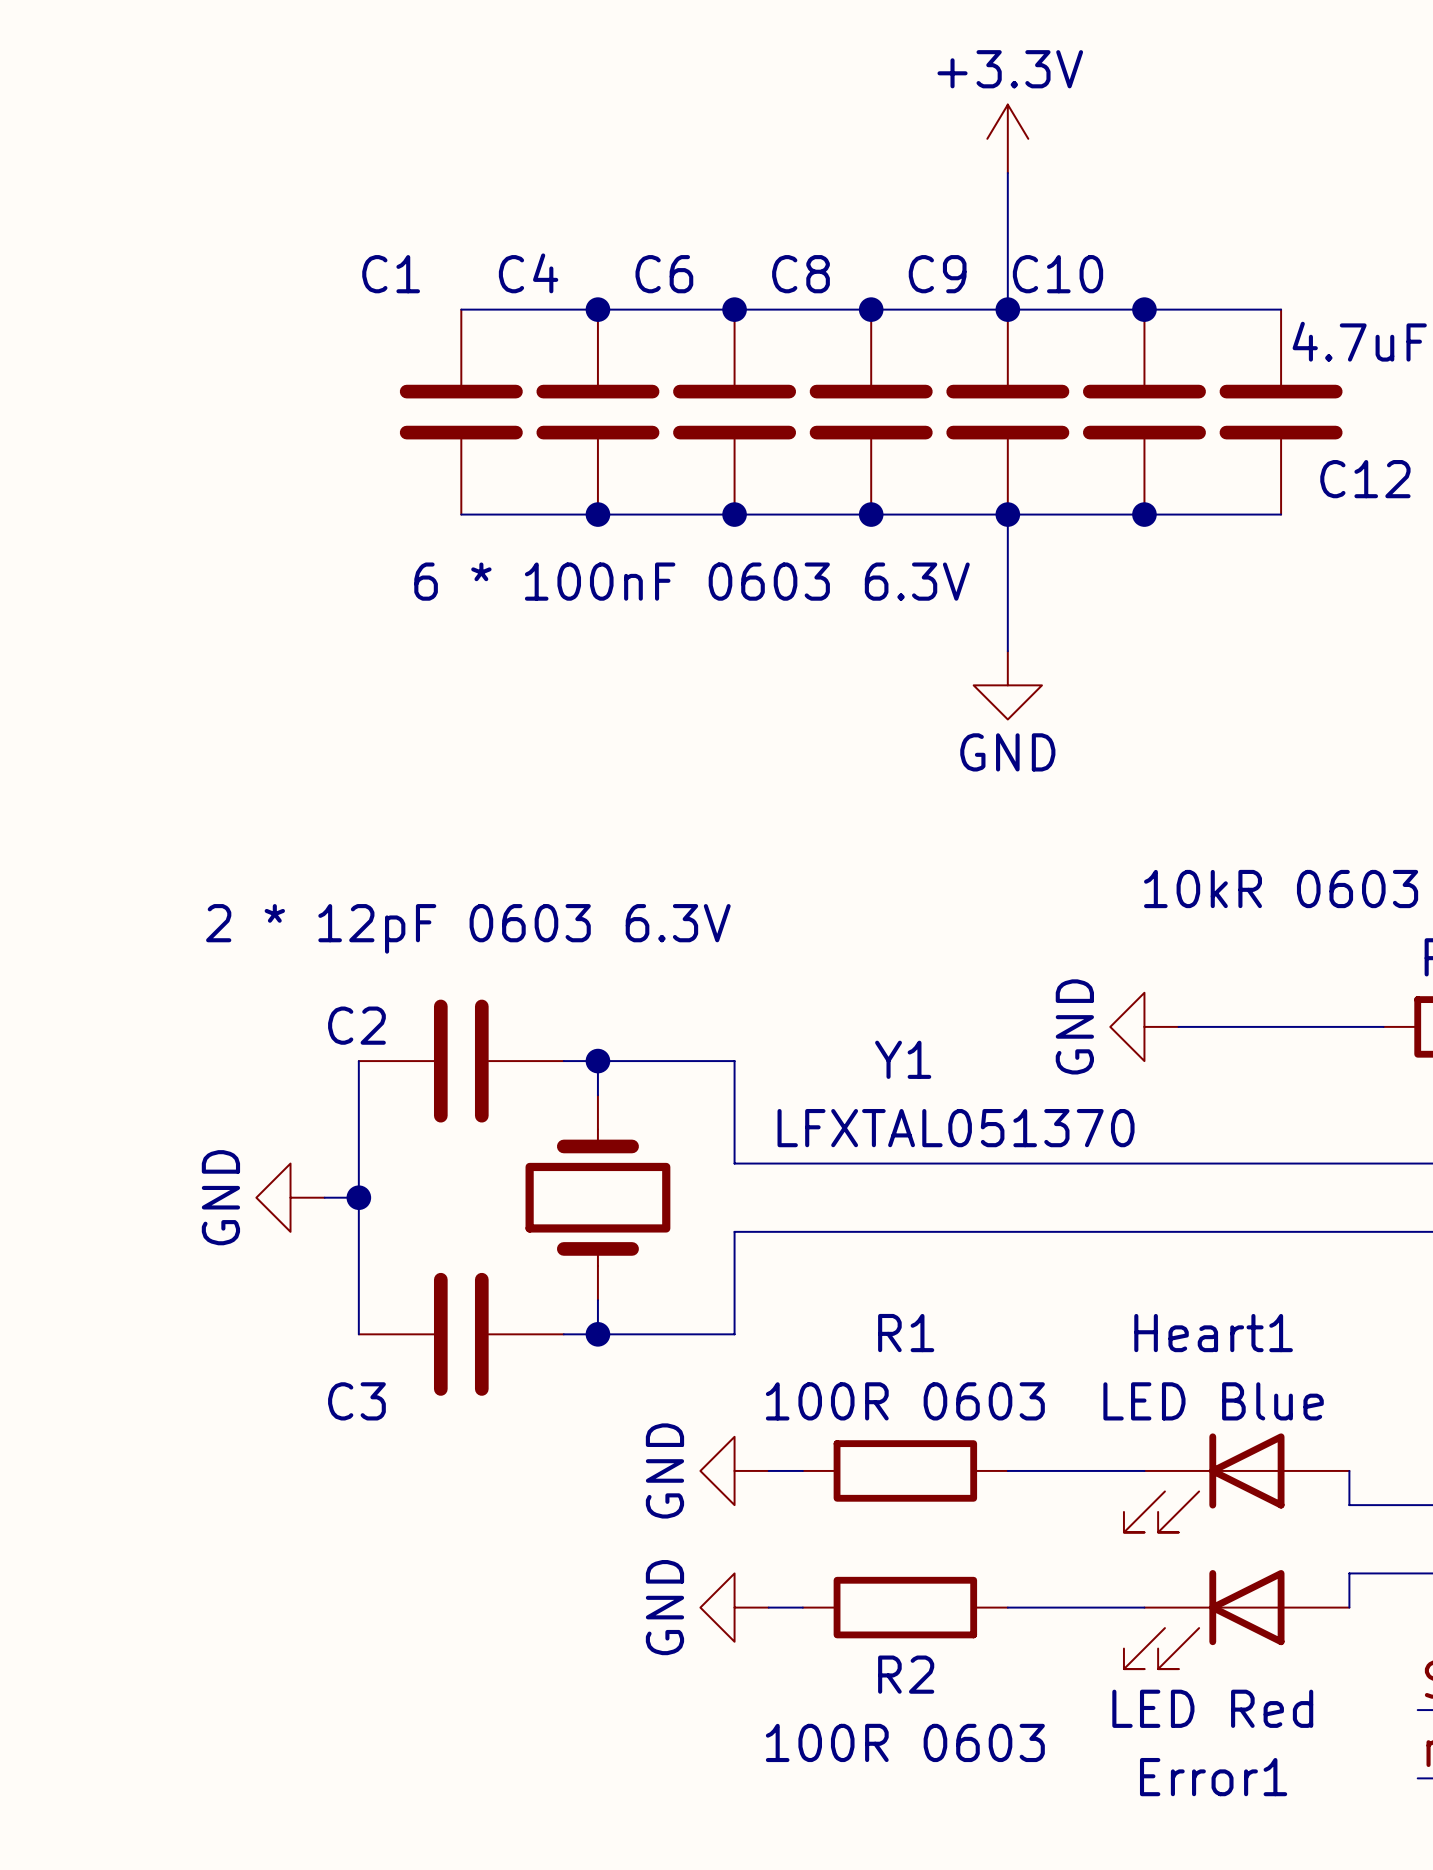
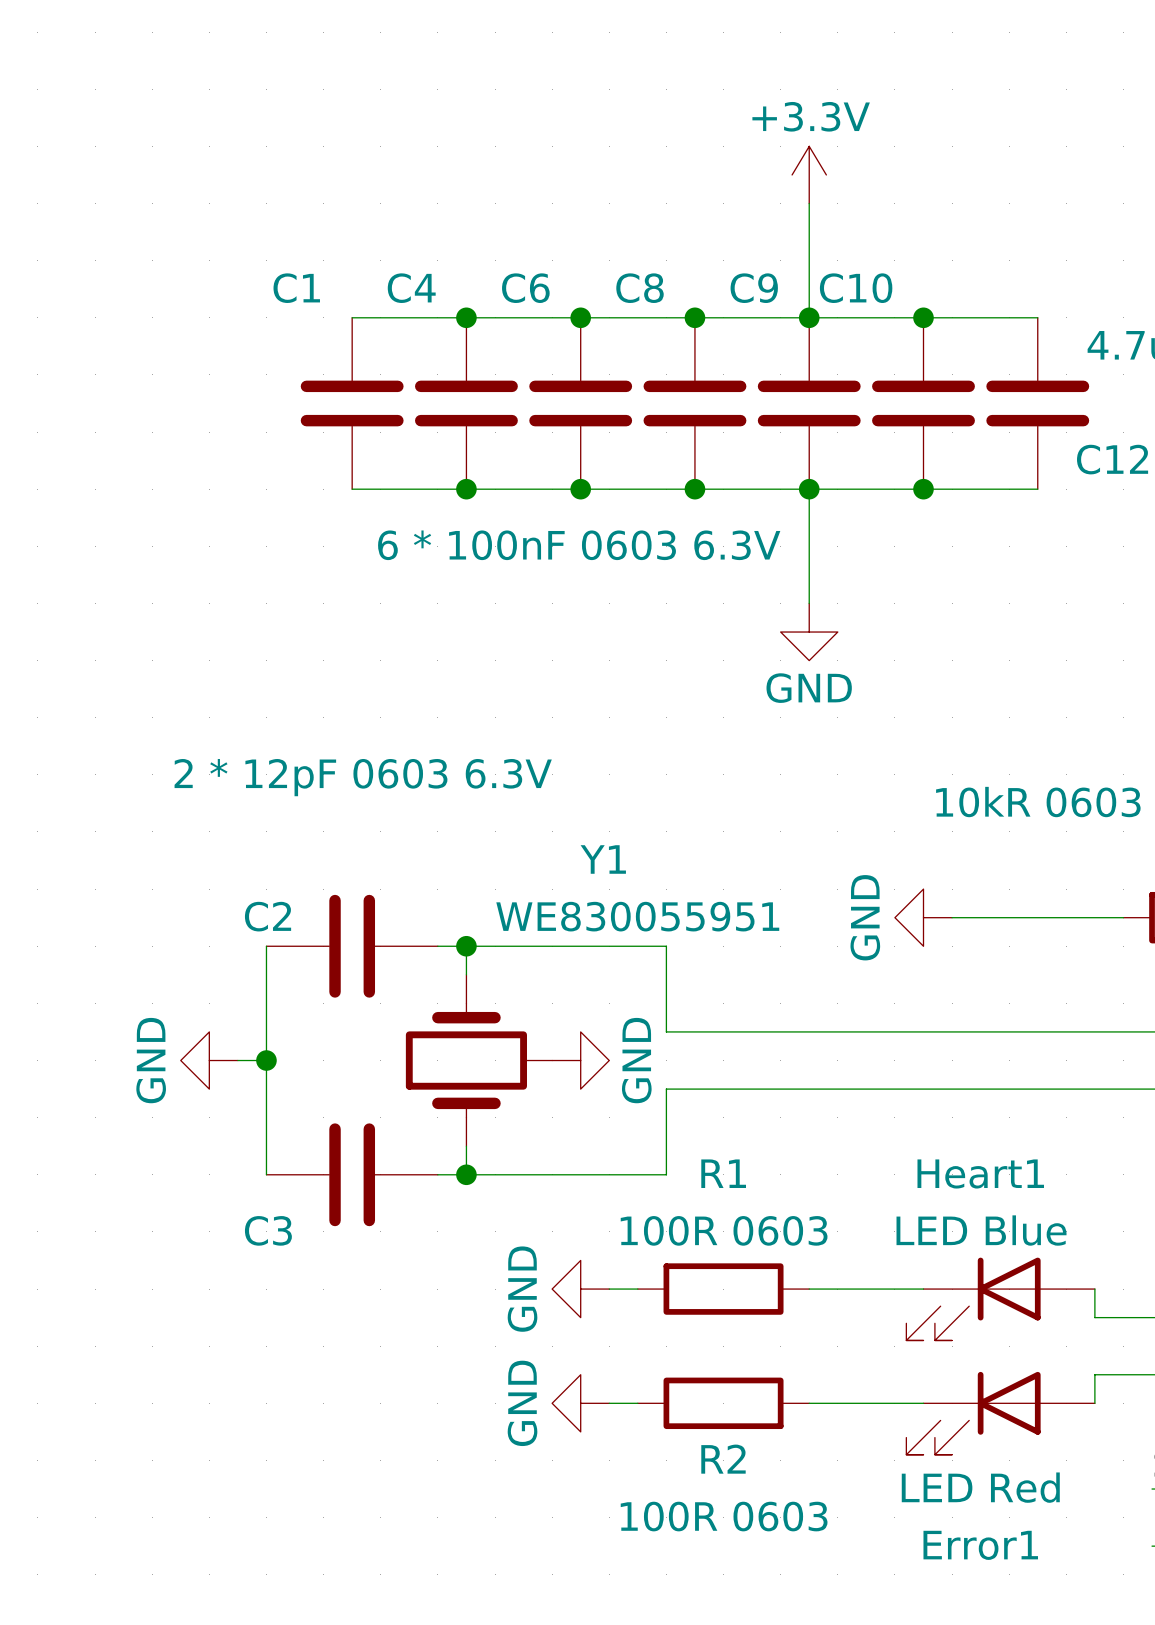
C3 value position: 2 * 12pF 0603 6.3V (468, 928) -> 2 * 12pF 0603 6.3V (363, 777)
Y1 name position: Y1 (903, 1059) -> Y1 (603, 859)
wire: (734, 1061) (734, 1163) (837, 1163) -> (580, 946) (666, 946) (666, 1031)
Y1 symbol: [525, 1095, 671, 1301] -> [405, 974, 553, 1147]
Y1 value: LFXTAL051370 (956, 1128) -> WE830055951 (637, 916)
power symbol: none -> GND (580, 1060)
wire: (837, 1231) (734, 1231) (734, 1334) -> (666, 1089) (666, 1174) (580, 1174)

